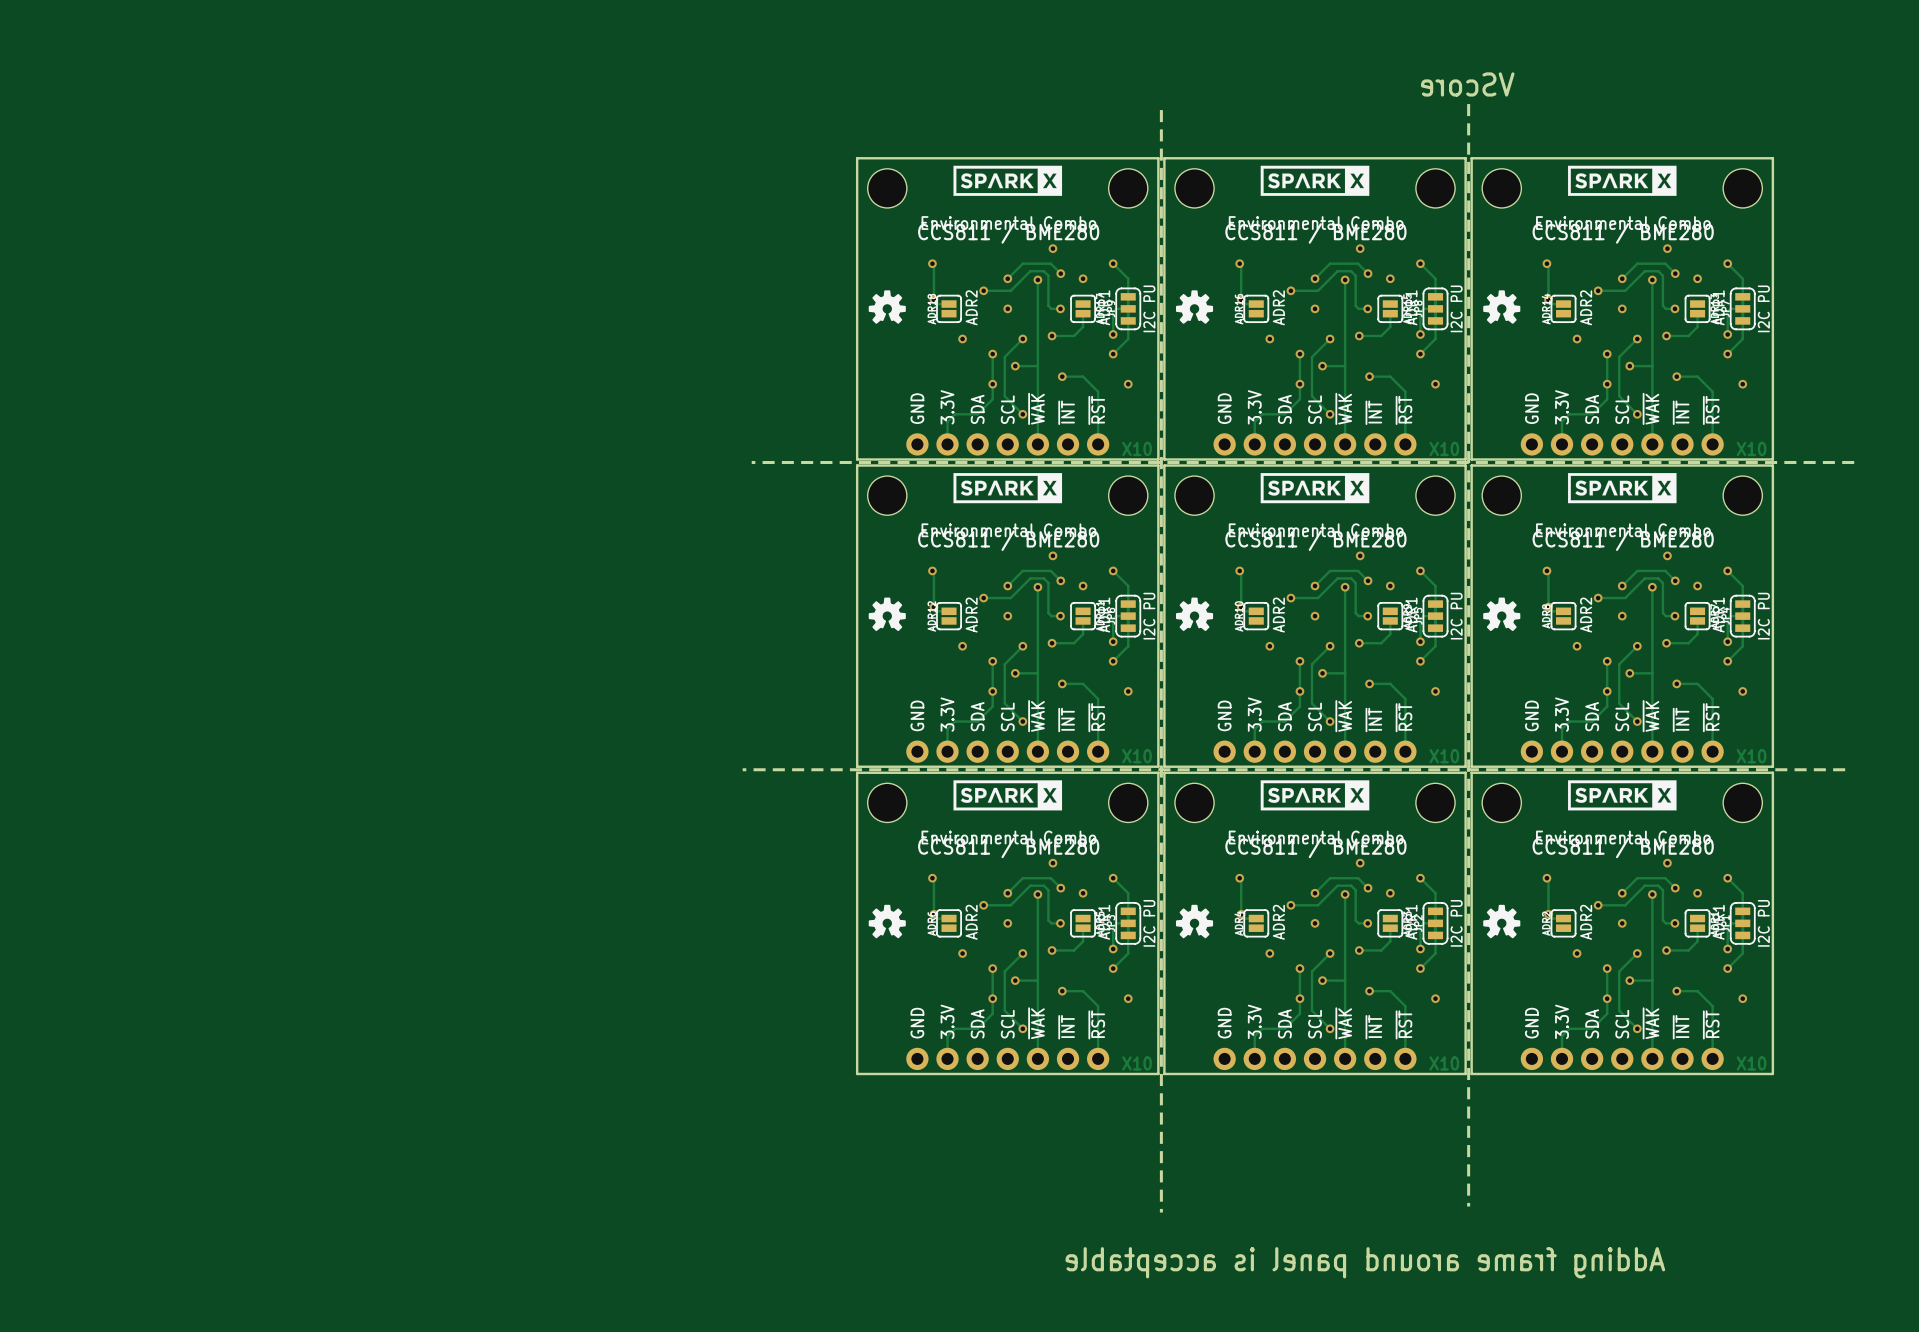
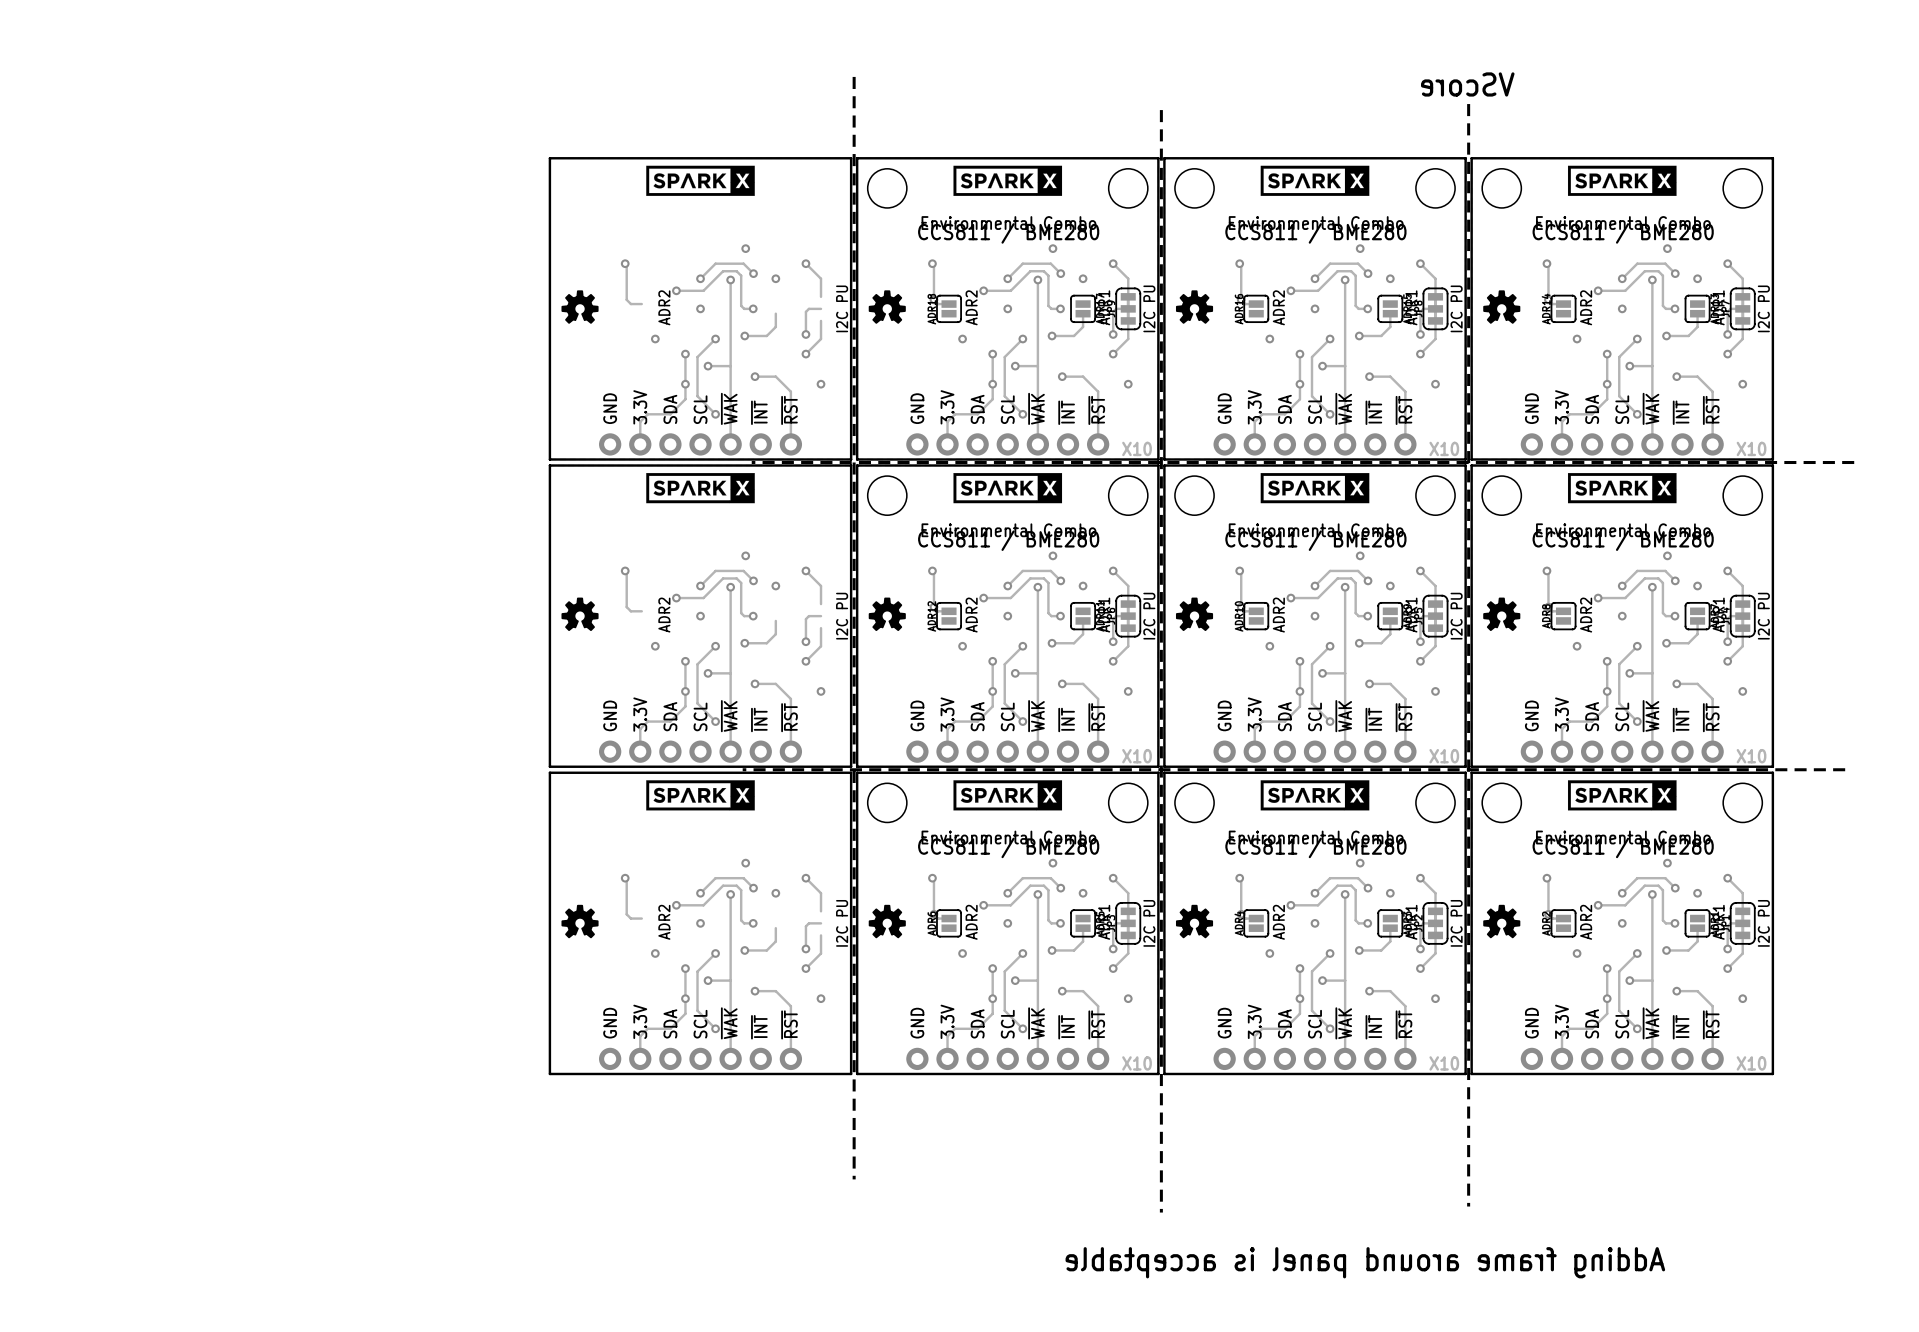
board edge: none -> (854, 76) (854, 1179)
board edge: none -> (851, 158) (851, 459) (549, 459) (549, 158) (851, 158)
drawing: none -> [646, 165, 755, 196]
via: none -> (745, 248)
track: none -> (625, 263) (626, 299) (630, 304) (641, 304)
via: none -> (625, 263)
track: none -> (805, 263) (821, 278) (821, 296)
via: none -> (805, 263)
track: none -> (753, 273) (743, 263) (715, 263) (700, 278)
via: none -> (753, 273)
via: none -> (700, 278)
via: none -> (775, 278)
track: none -> (730, 279) (730, 444)
via: none -> (730, 279)
drawing: none -> [561, 290, 599, 324]
track: none -> (676, 290) (703, 290) (723, 271) (736, 271) (741, 275) (741, 305) (744, 308) (753, 308)
via: none -> (676, 290)
text: none -> ADR2 (664, 307)
via: none -> (700, 308)
via: none -> (753, 308)
track: none -> (821, 308) (808, 308) (805, 311) (805, 334)
text: none -> I2C PU (842, 308)
track: none -> (775, 313) (775, 326) (766, 335) (744, 335)
track: none -> (821, 320) (821, 339) (805, 354)
via: none -> (805, 334)
via: none -> (744, 335)
via: none -> (655, 339)
track: none -> (715, 339) (697, 357) (697, 396) (715, 414)
via: none -> (715, 339)
track: none -> (685, 354) (685, 399) (670, 414) (647, 414) (640, 421) (640, 444)
via: none -> (685, 354)
via: none -> (805, 354)
via: none -> (708, 366)
track: none -> (730, 366) (708, 366)
track: none -> (755, 376) (775, 376) (790, 391) (790, 444)
via: none -> (755, 376)
via: none -> (685, 384)
via: none -> (821, 384)
text: none -> 3.3V (640, 407)
text: none -> GND (610, 408)
text: none -> ~{WAK} (729, 408)
text: none -> SDA (670, 409)
text: none -> SCL (700, 409)
text: none -> ~{RST} (789, 410)
text: none -> ~{INT} (759, 412)
via: none -> (715, 414)
part: none -> (655, 444)
part: none -> (760, 444)
board edge: none -> (851, 465) (851, 766) (549, 766) (549, 465) (851, 465)
drawing: none -> [646, 473, 755, 504]
via: none -> (745, 555)
track: none -> (625, 570) (626, 607) (630, 611) (641, 611)
via: none -> (625, 570)
track: none -> (805, 570) (821, 586) (821, 604)
via: none -> (805, 570)
track: none -> (753, 580) (743, 570) (715, 570) (700, 586)
via: none -> (753, 580)
via: none -> (700, 586)
via: none -> (775, 586)
track: none -> (730, 587) (730, 751)
via: none -> (730, 587)
drawing: none -> [561, 597, 599, 632]
track: none -> (676, 598) (703, 598) (723, 578) (736, 578) (741, 582) (741, 613) (744, 616) (753, 616)
via: none -> (676, 598)
text: none -> ADR2 (664, 615)
via: none -> (700, 616)
via: none -> (753, 616)
track: none -> (821, 616) (808, 616) (805, 619) (805, 641)
text: none -> I2C PU (842, 616)
track: none -> (775, 620) (775, 634) (766, 643) (744, 643)
track: none -> (821, 628) (821, 646) (805, 661)
via: none -> (805, 641)
via: none -> (744, 643)
via: none -> (655, 646)
track: none -> (715, 646) (697, 664) (697, 703) (715, 721)
via: none -> (715, 646)
track: none -> (685, 661) (685, 706) (670, 721) (647, 721) (640, 729) (640, 751)
via: none -> (685, 661)
via: none -> (805, 661)
via: none -> (708, 673)
track: none -> (730, 673) (708, 673)
track: none -> (755, 683) (775, 683) (790, 698) (790, 751)
via: none -> (755, 683)
via: none -> (685, 691)
via: none -> (821, 691)
text: none -> 3.3V (640, 714)
text: none -> GND (610, 715)
text: none -> SDA (670, 716)
text: none -> SCL (700, 716)
text: none -> ~{WAK} (729, 716)
text: none -> ~{RST} (789, 717)
text: none -> ~{INT} (759, 719)
via: none -> (715, 721)
part: none -> (655, 751)
part: none -> (760, 751)
board edge: none -> (851, 772) (851, 1073) (549, 1073) (549, 772) (851, 772)
drawing: none -> [646, 780, 755, 811]
via: none -> (745, 863)
track: none -> (625, 878) (626, 914) (630, 918) (641, 918)
via: none -> (625, 878)
track: none -> (805, 878) (821, 893) (821, 911)
via: none -> (805, 878)
track: none -> (753, 888) (743, 878) (715, 878) (700, 893)
via: none -> (753, 888)
via: none -> (700, 893)
via: none -> (775, 893)
track: none -> (730, 894) (730, 1058)
via: none -> (730, 894)
drawing: none -> [561, 904, 599, 939]
track: none -> (676, 905) (703, 905) (723, 885) (736, 885) (741, 890) (741, 920) (744, 923) (753, 923)
via: none -> (676, 905)
text: none -> ADR2 (664, 922)
via: none -> (700, 923)
via: none -> (753, 923)
track: none -> (821, 923) (808, 923) (805, 926) (805, 948)
text: none -> I2C PU (842, 923)
track: none -> (775, 928) (775, 941) (766, 950) (744, 950)
track: none -> (821, 935) (821, 953) (805, 968)
via: none -> (805, 948)
via: none -> (744, 950)
via: none -> (655, 953)
track: none -> (715, 953) (697, 971) (697, 1010) (715, 1028)
via: none -> (715, 953)
track: none -> (685, 968) (685, 1013) (670, 1028) (647, 1028) (640, 1036) (640, 1058)
via: none -> (685, 968)
via: none -> (805, 968)
via: none -> (708, 980)
track: none -> (730, 980) (708, 980)
track: none -> (755, 991) (775, 991) (790, 1006) (790, 1058)
via: none -> (755, 991)
via: none -> (685, 998)
via: none -> (821, 998)
text: none -> 3.3V (640, 1021)
text: none -> GND (610, 1023)
text: none -> SDA (670, 1023)
text: none -> ~{WAK} (729, 1023)
text: none -> SCL (700, 1024)
text: none -> ~{RST} (789, 1024)
text: none -> ~{INT} (759, 1027)
via: none -> (715, 1028)
part: none -> (655, 1058)
part: none -> (760, 1058)

